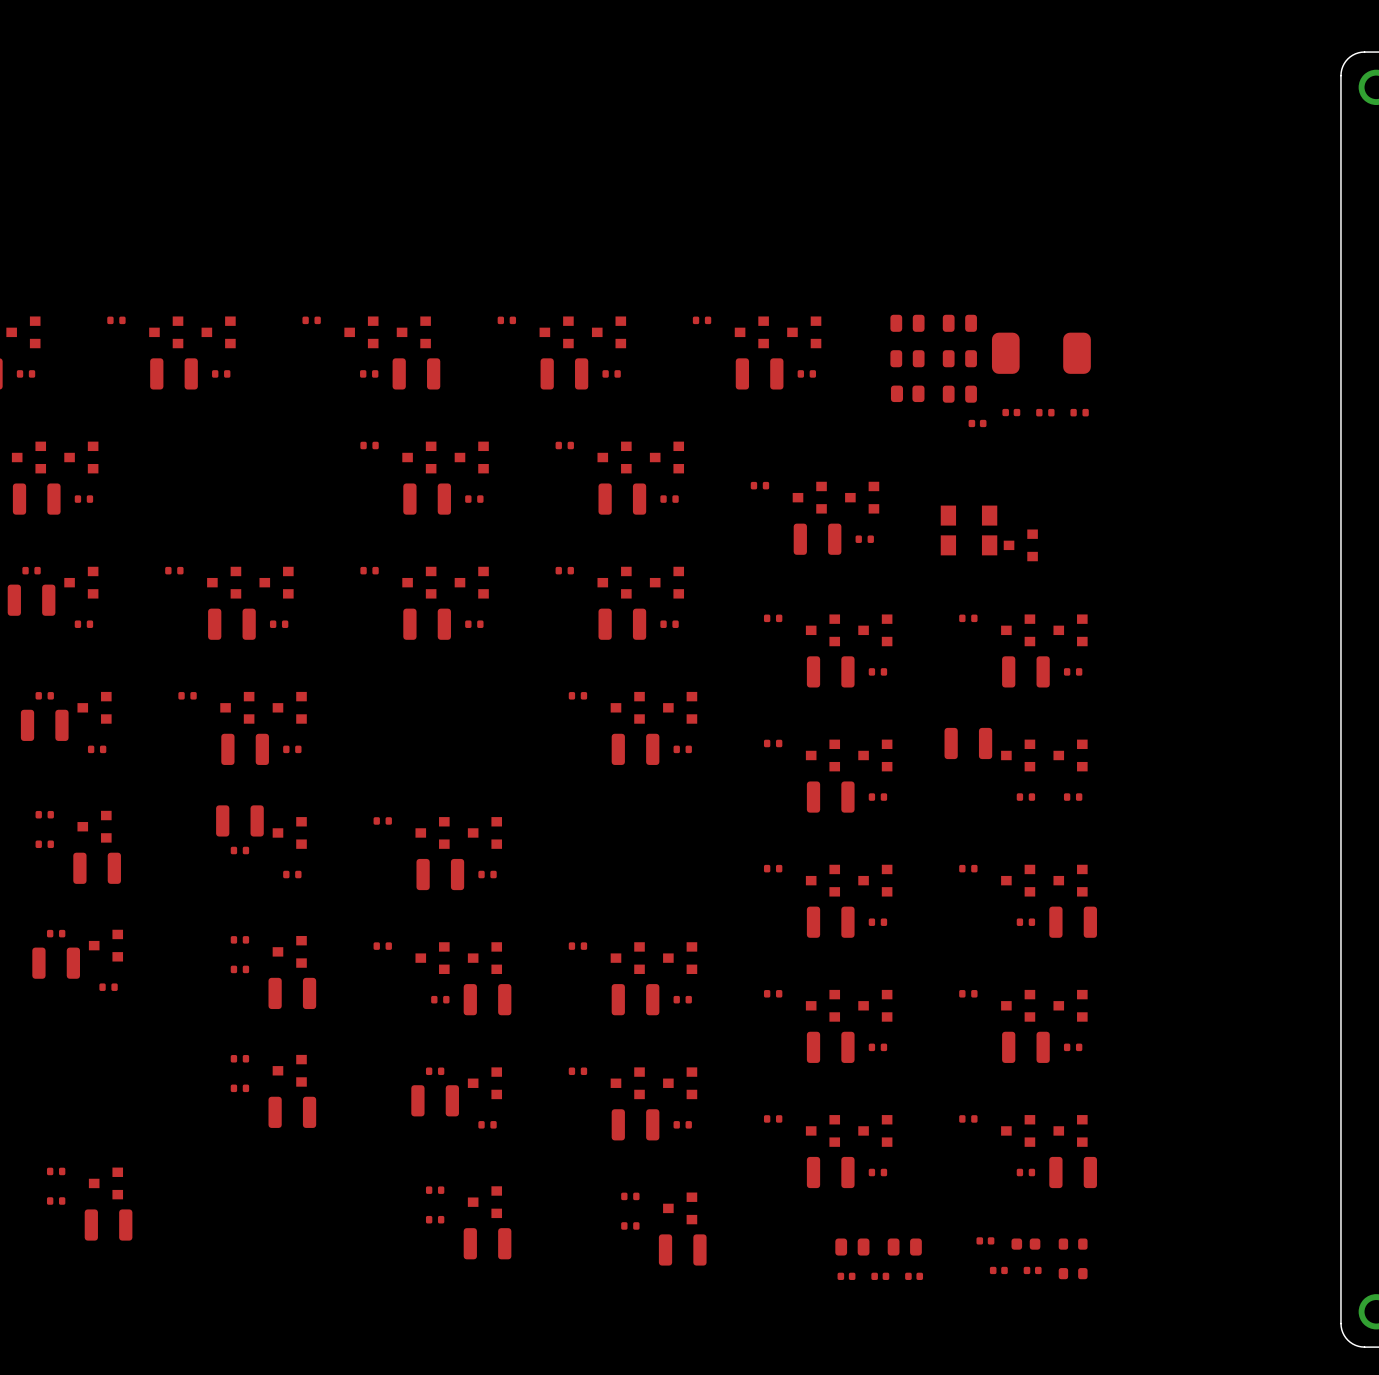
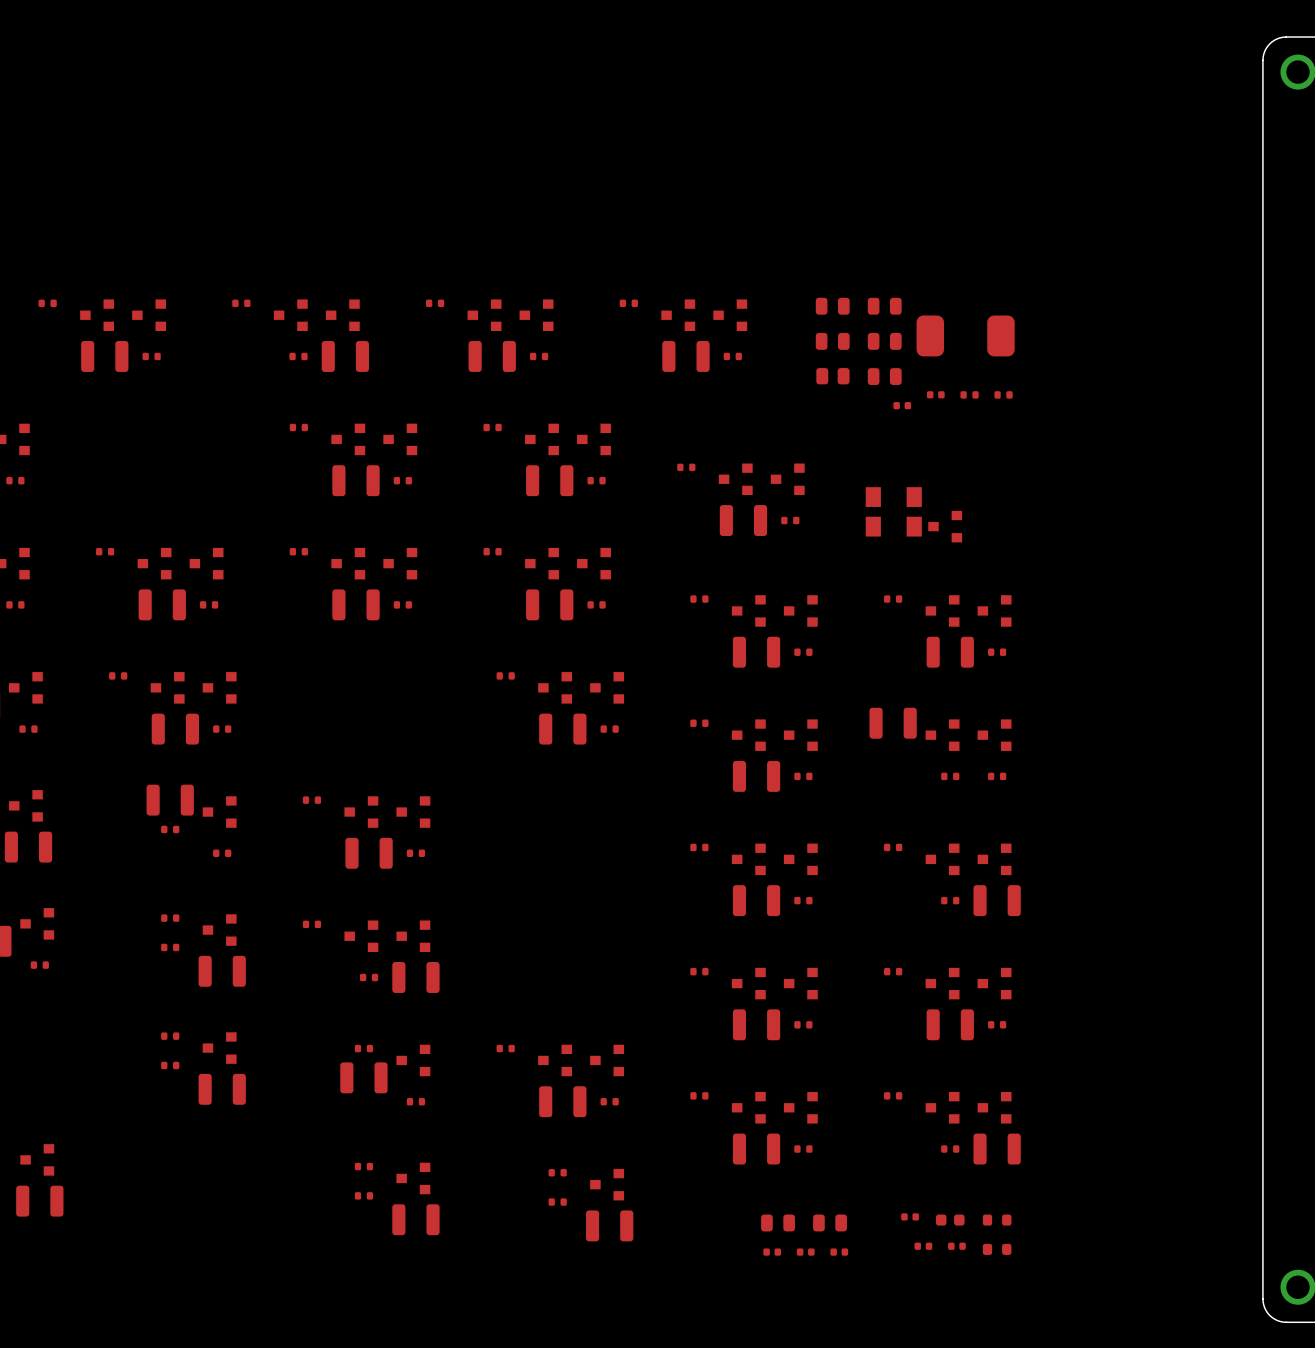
part: (577, 946) -> none
part: (627, 958) -> none
part: (680, 958) -> none
part: (635, 999) -> none
part: (682, 999) -> none

